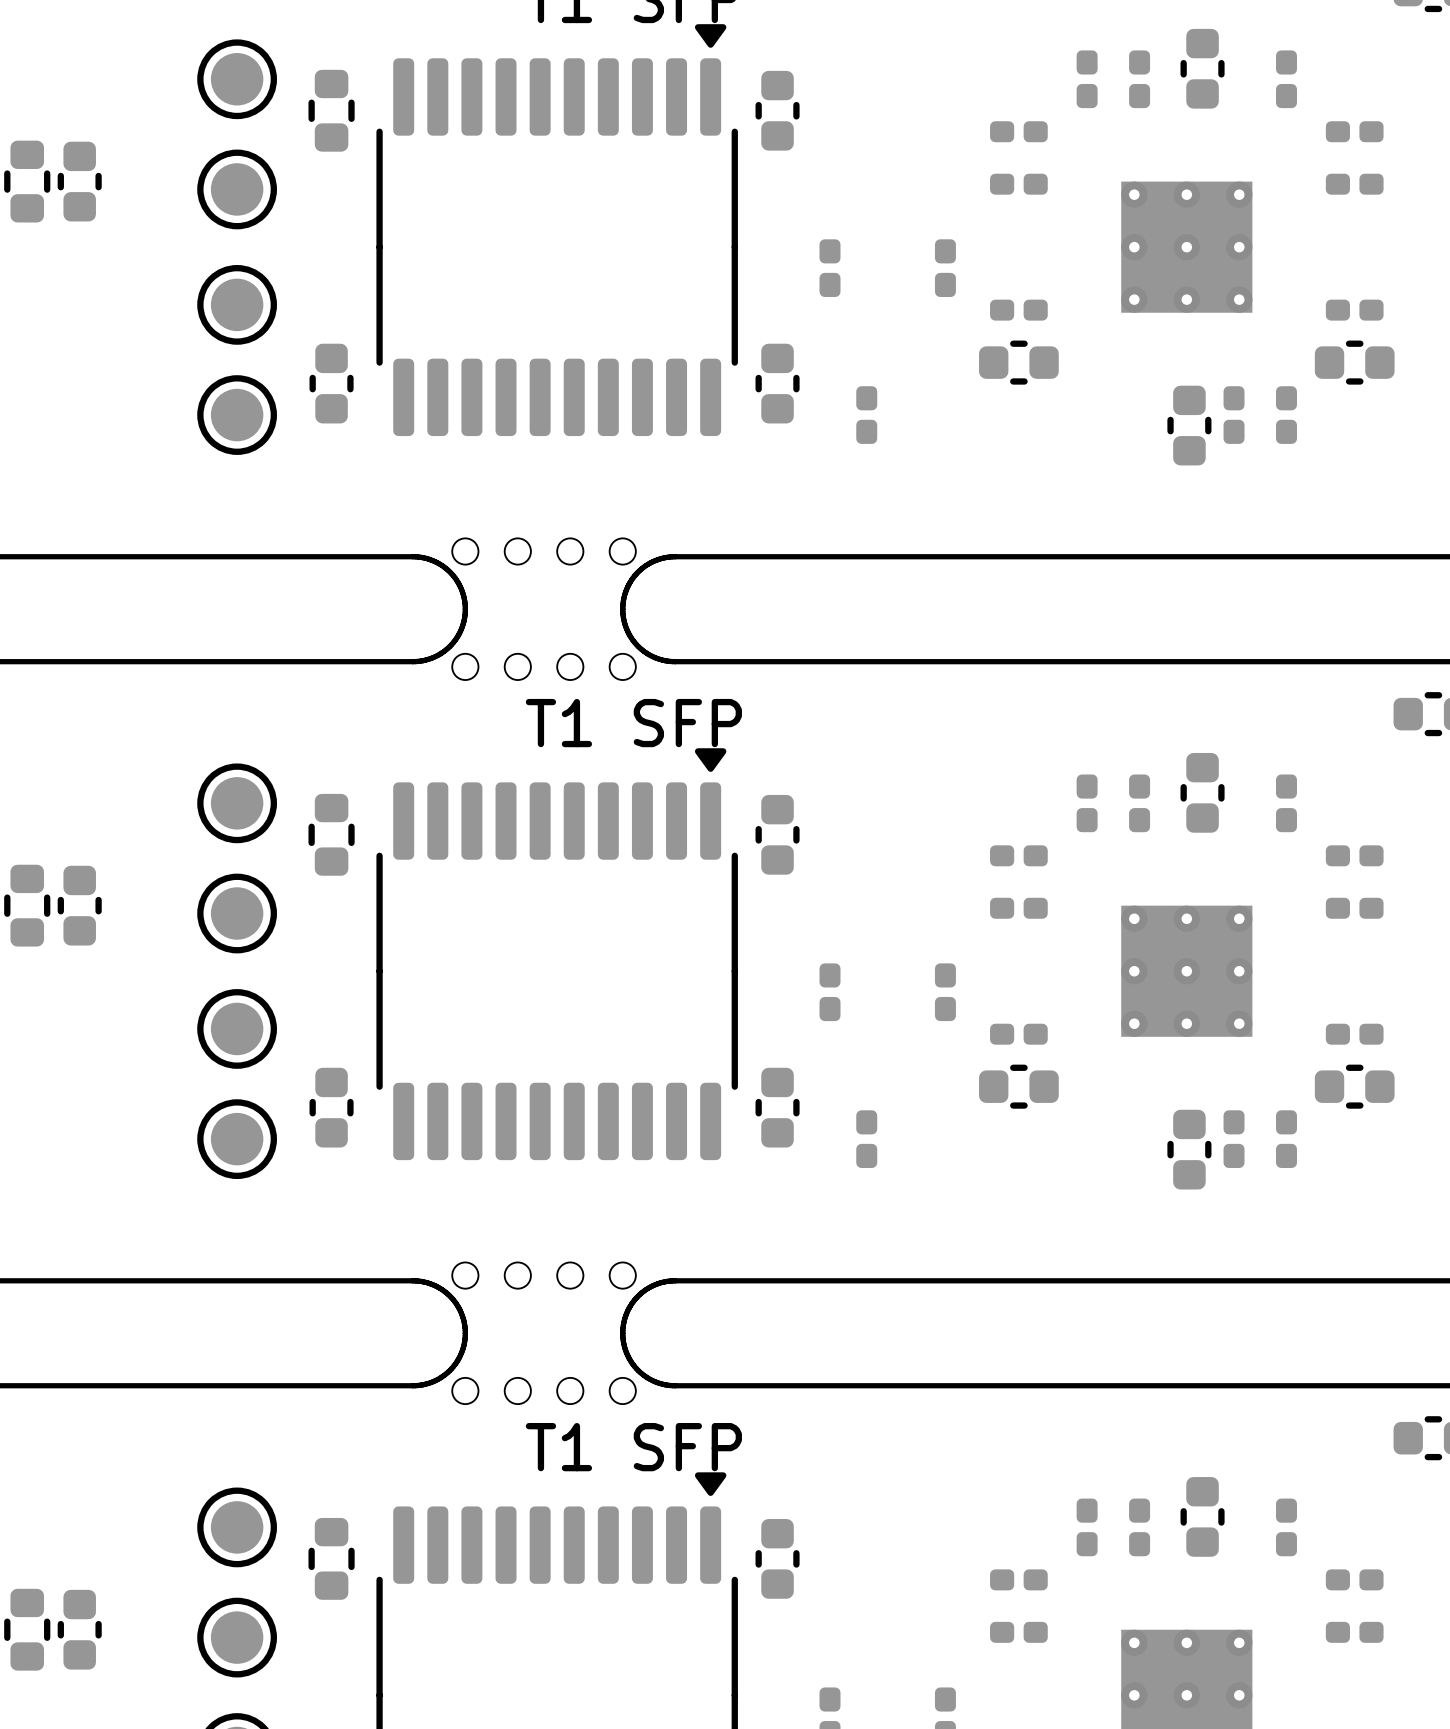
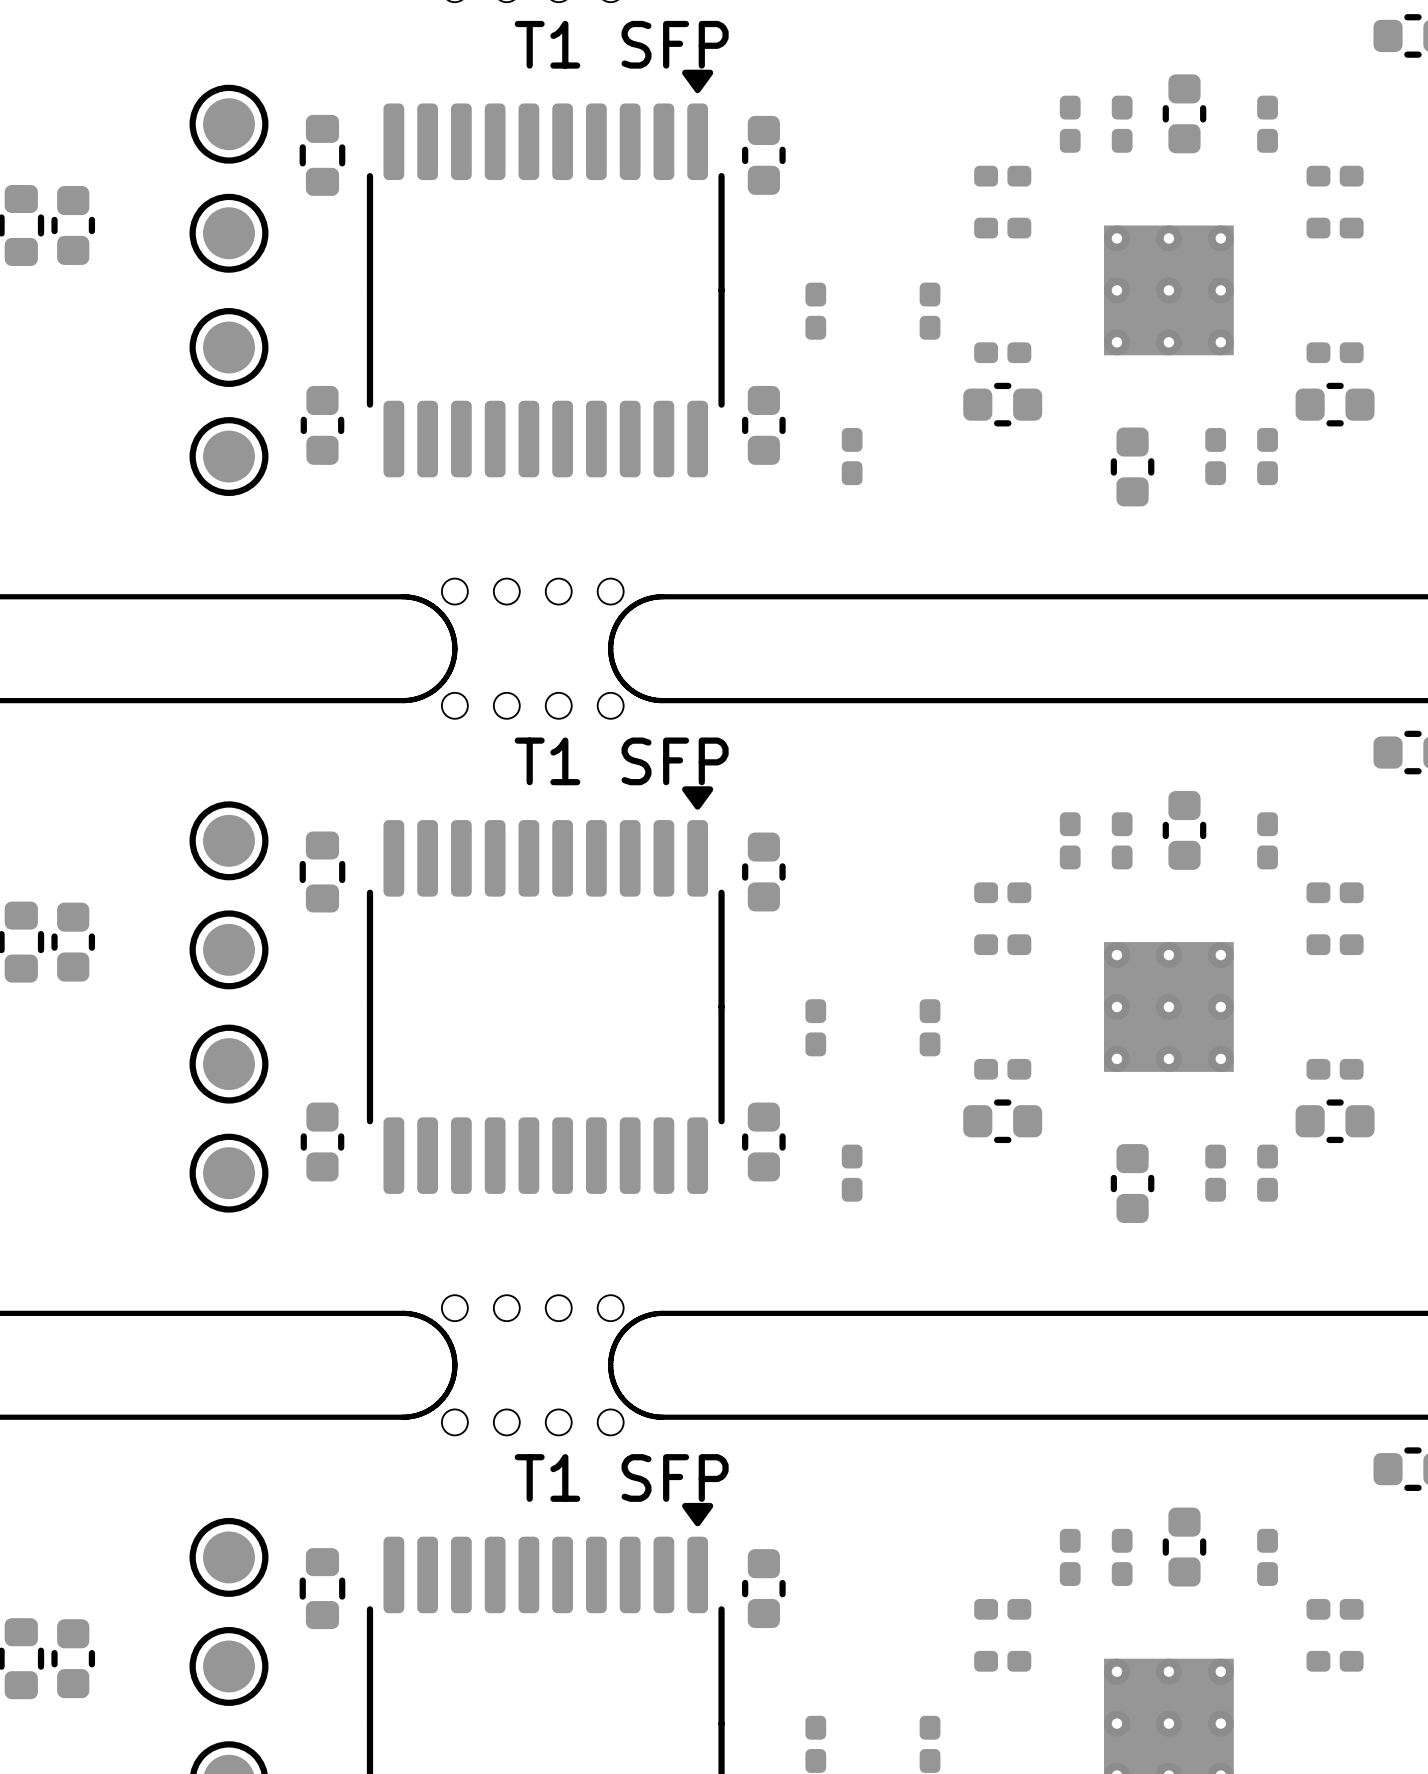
part position: (1189, 425) -> (1132, 466)
part position: (1189, 1149) -> (1132, 1183)

